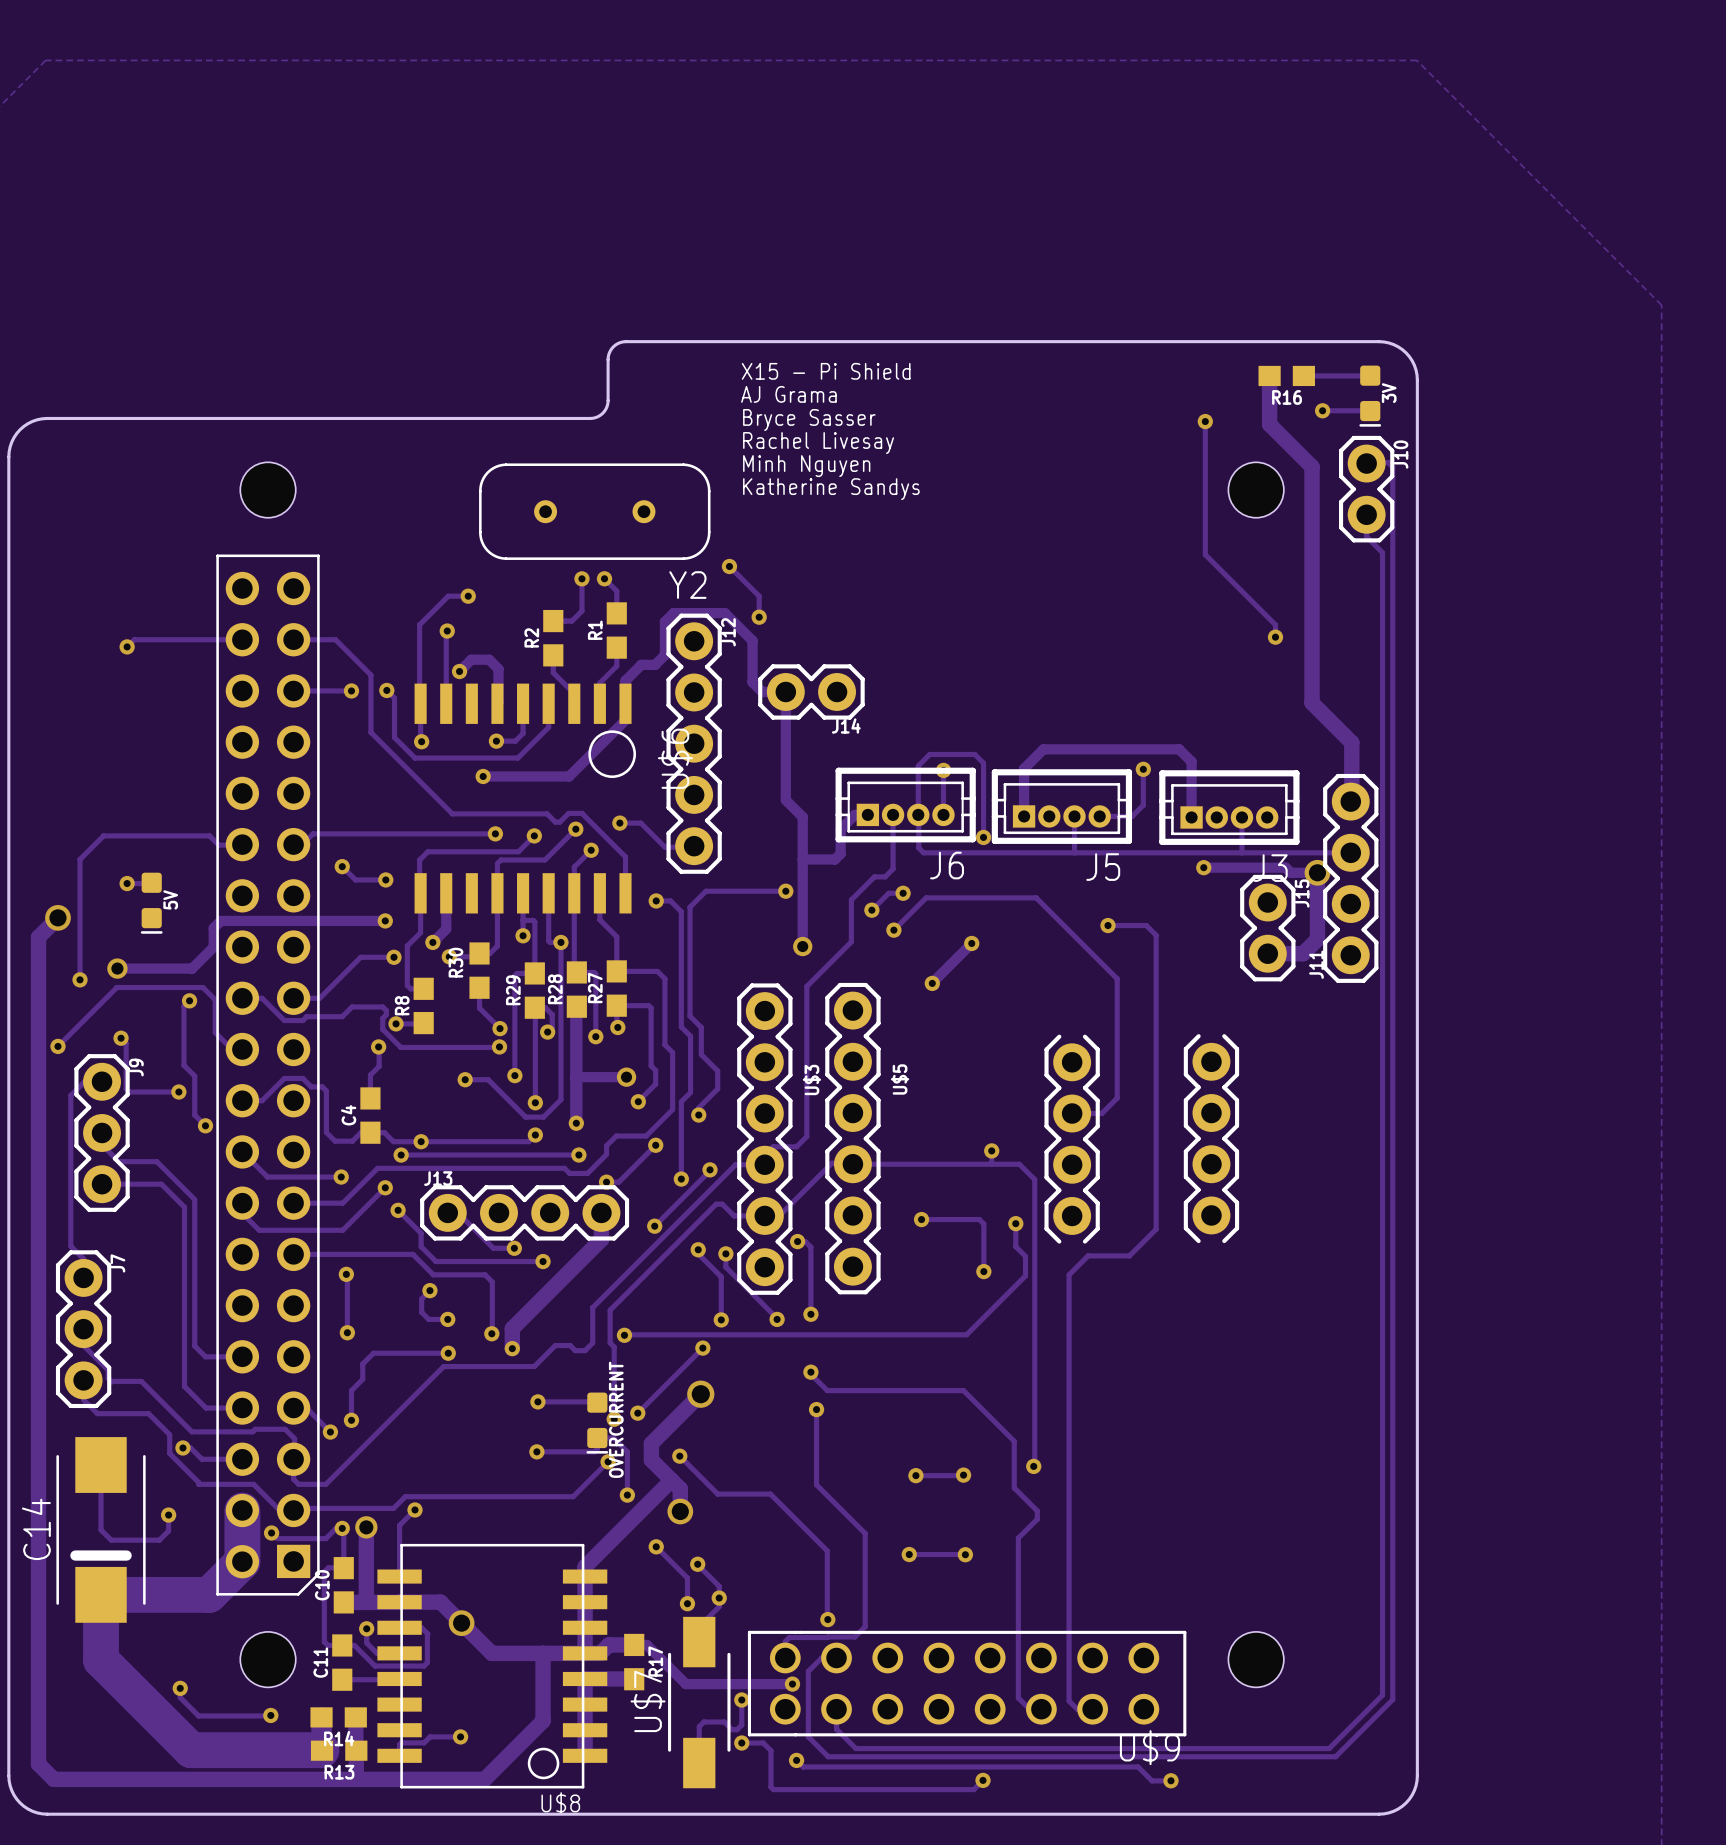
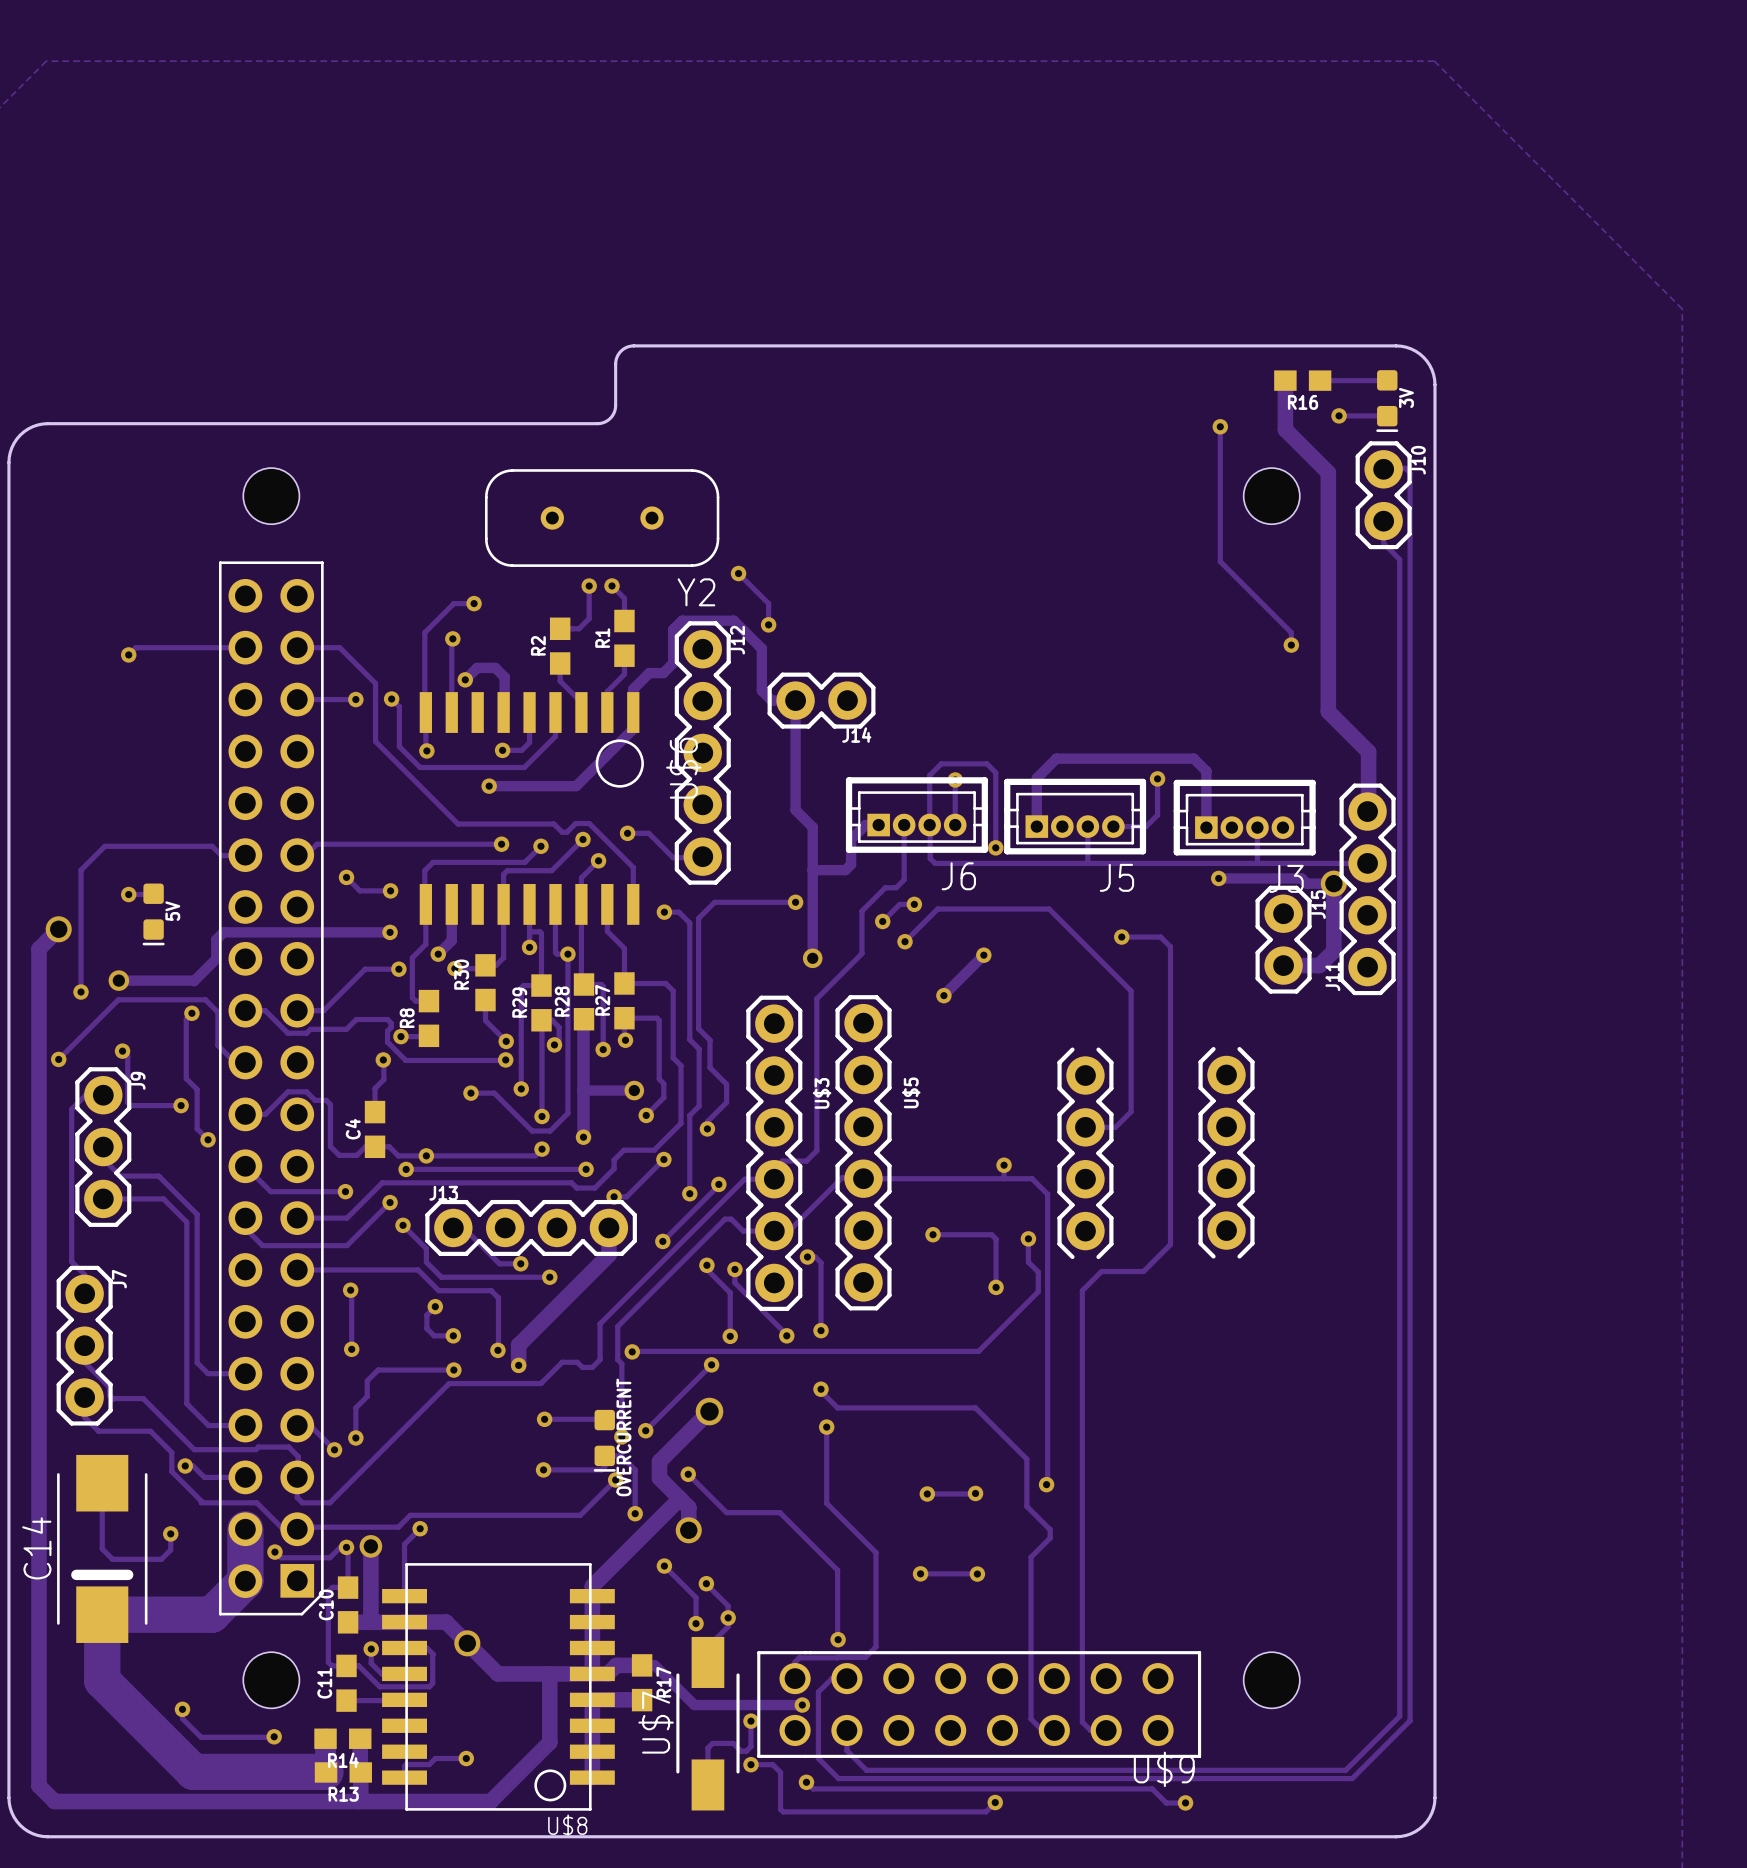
text: X15 - Pi Shield (826, 371) -> none
text: AJ Grama (788, 394) -> none
text: Bryce Sasser (809, 420) -> none
text: Rachel Livesay (818, 443) -> none
text: Minh Nguyen (806, 466) -> none
text: Katherine Sandys (831, 489) -> none

